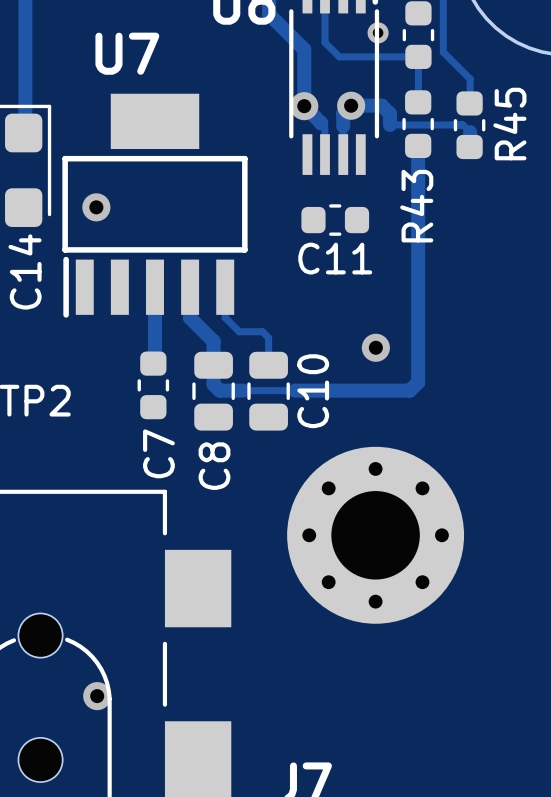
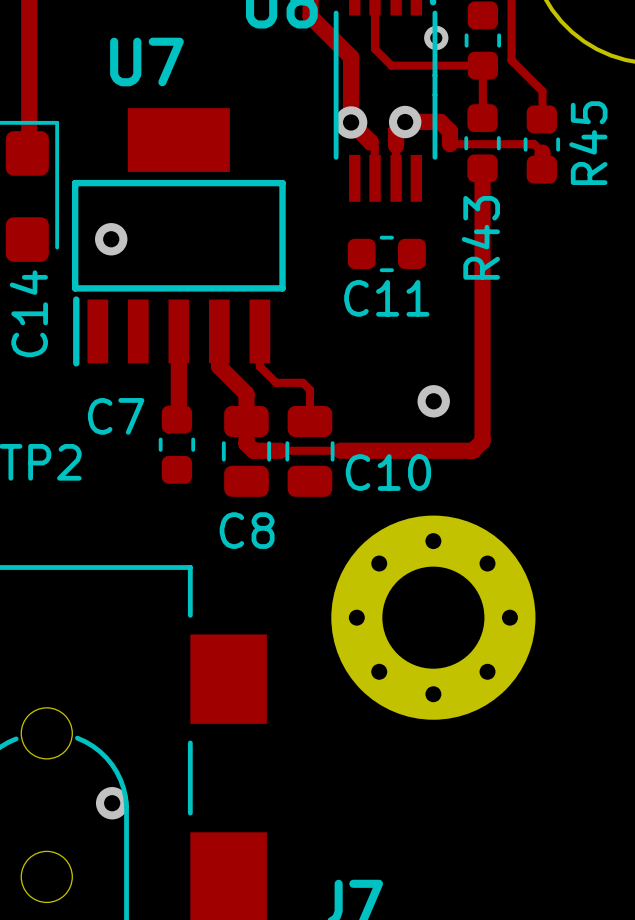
C10 name rotation: 0° (313, 391) -> 90° clockwise (388, 472)
C7 name rotation: 0° (158, 453) -> 90° clockwise (116, 416)
C7 name position: C7 (158, 453) -> C7 (116, 416)
C8 name rotation: 0° (214, 466) -> 90° clockwise (247, 530)

